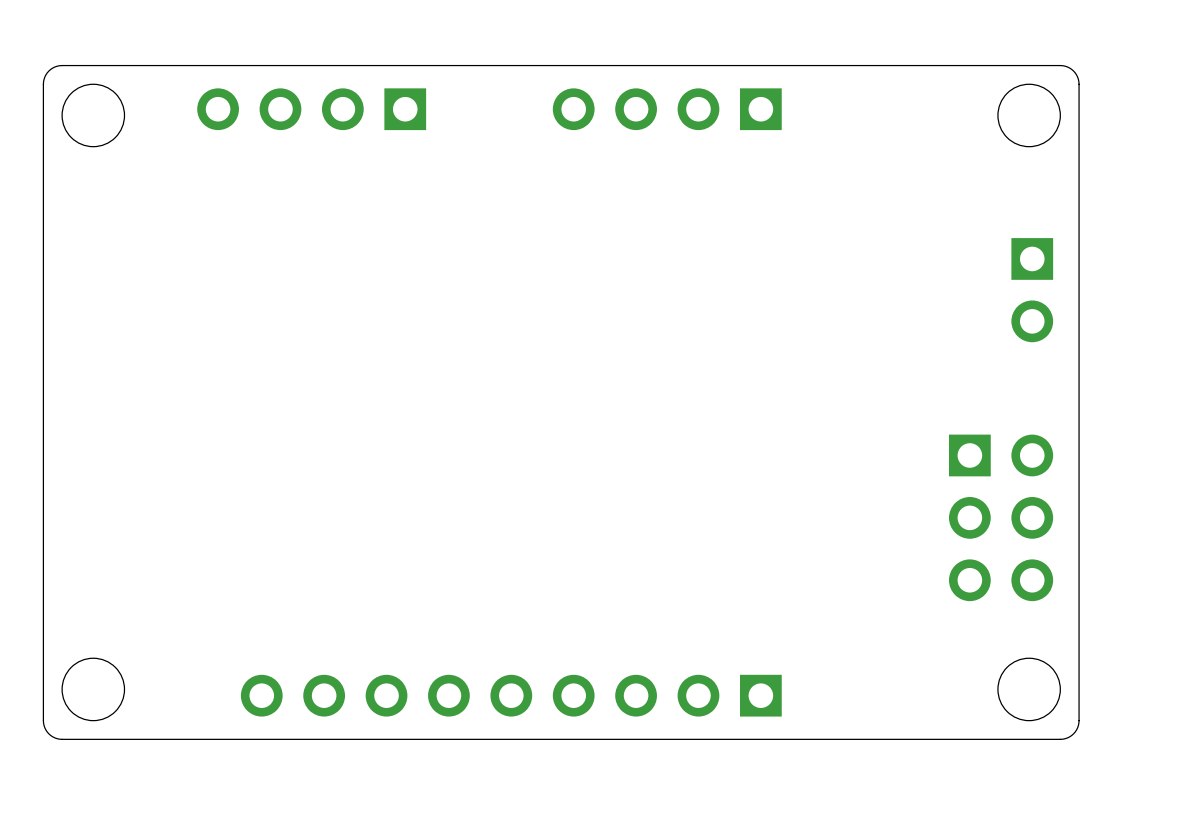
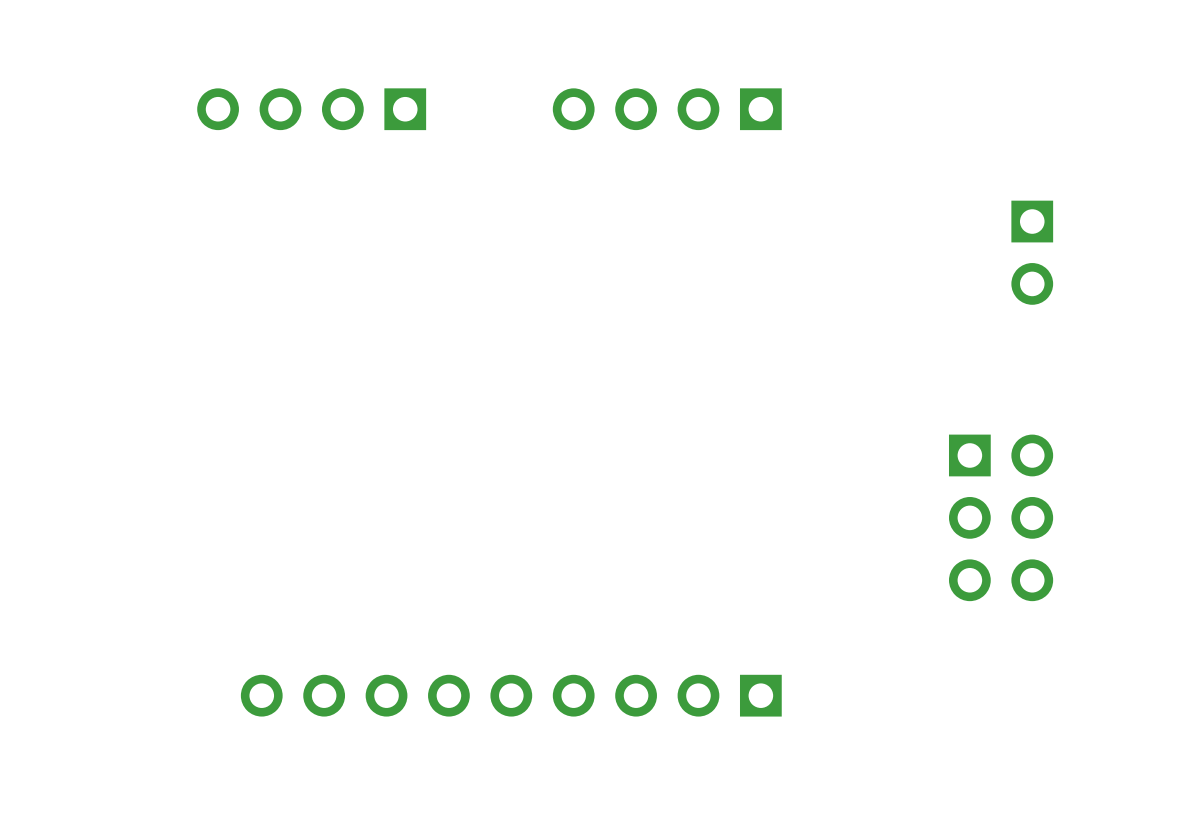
board edge: (1060, 65) (62, 65) (52, 68) (45, 74) (43, 84) (43, 720) (45, 729) (52, 736) (62, 739) (1060, 739) (1069, 736) (1076, 729) (1079, 720) (1079, 84) (1073, 71) (1060, 65) -> none
round board edge: [61, 83, 126, 148] -> none
round board edge: [997, 83, 1061, 148] -> none
part position: (1032, 290) -> (1032, 252)
round board edge: [61, 657, 126, 722] -> none
round board edge: [997, 657, 1061, 722] -> none

